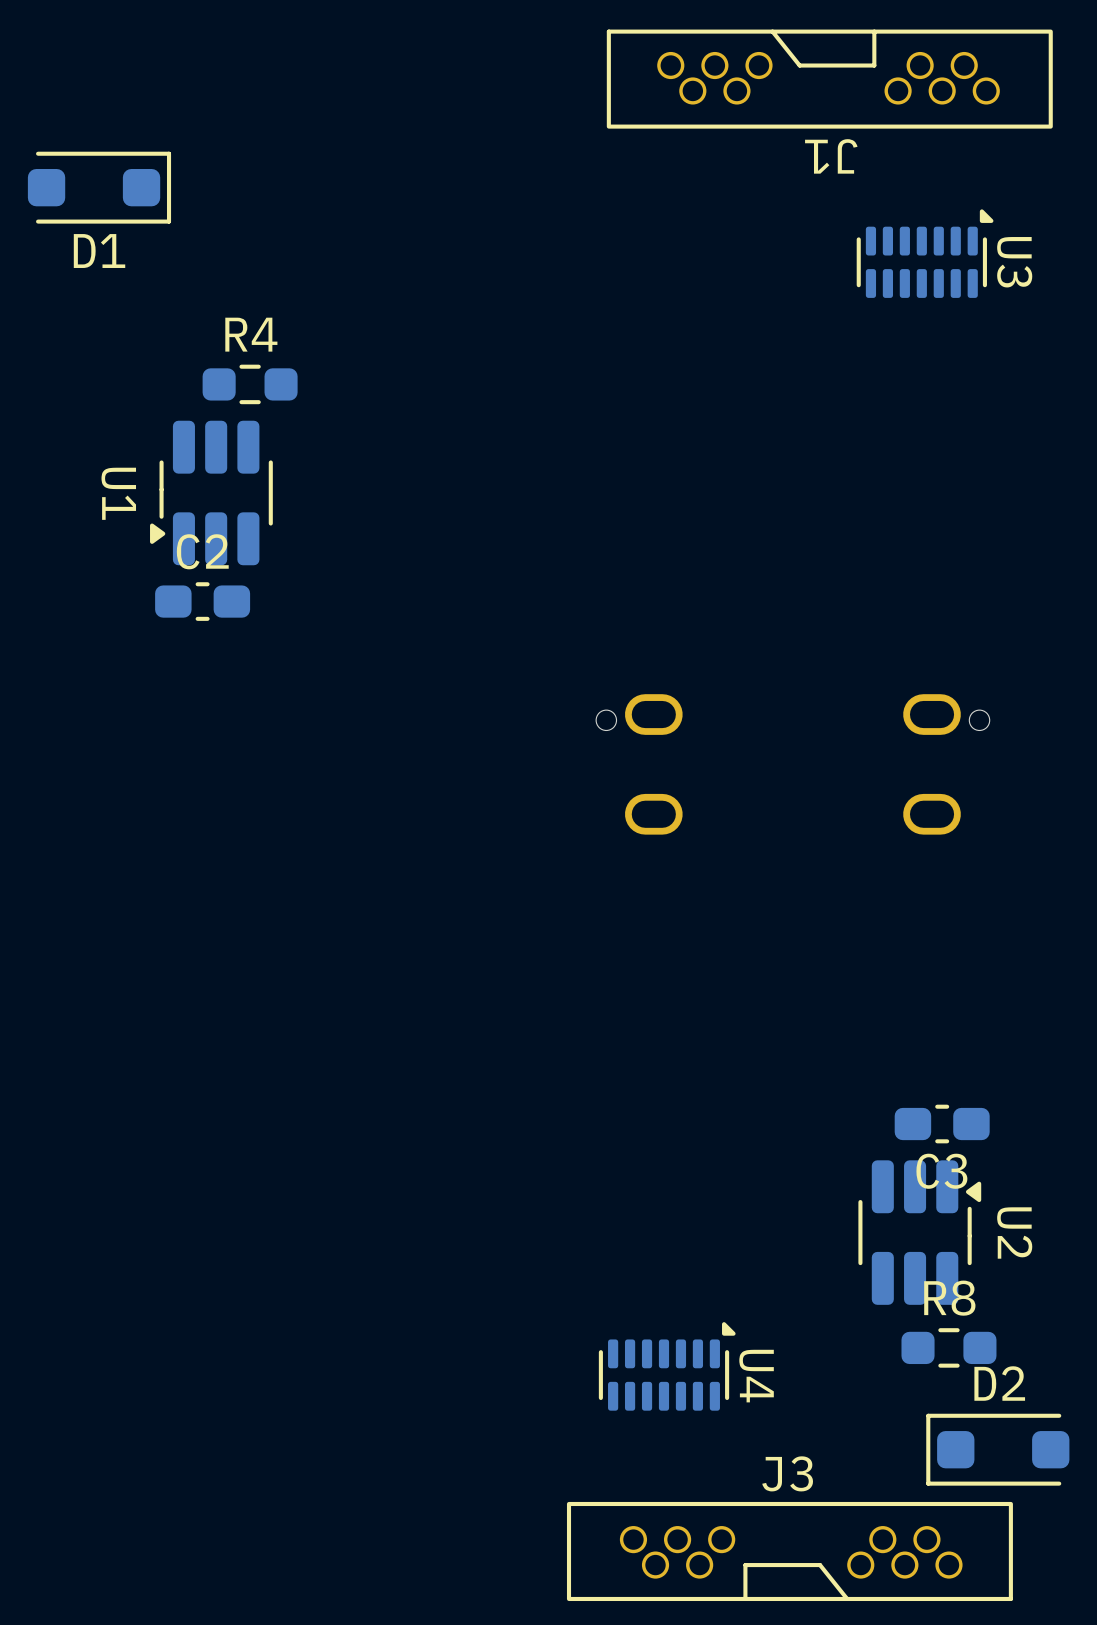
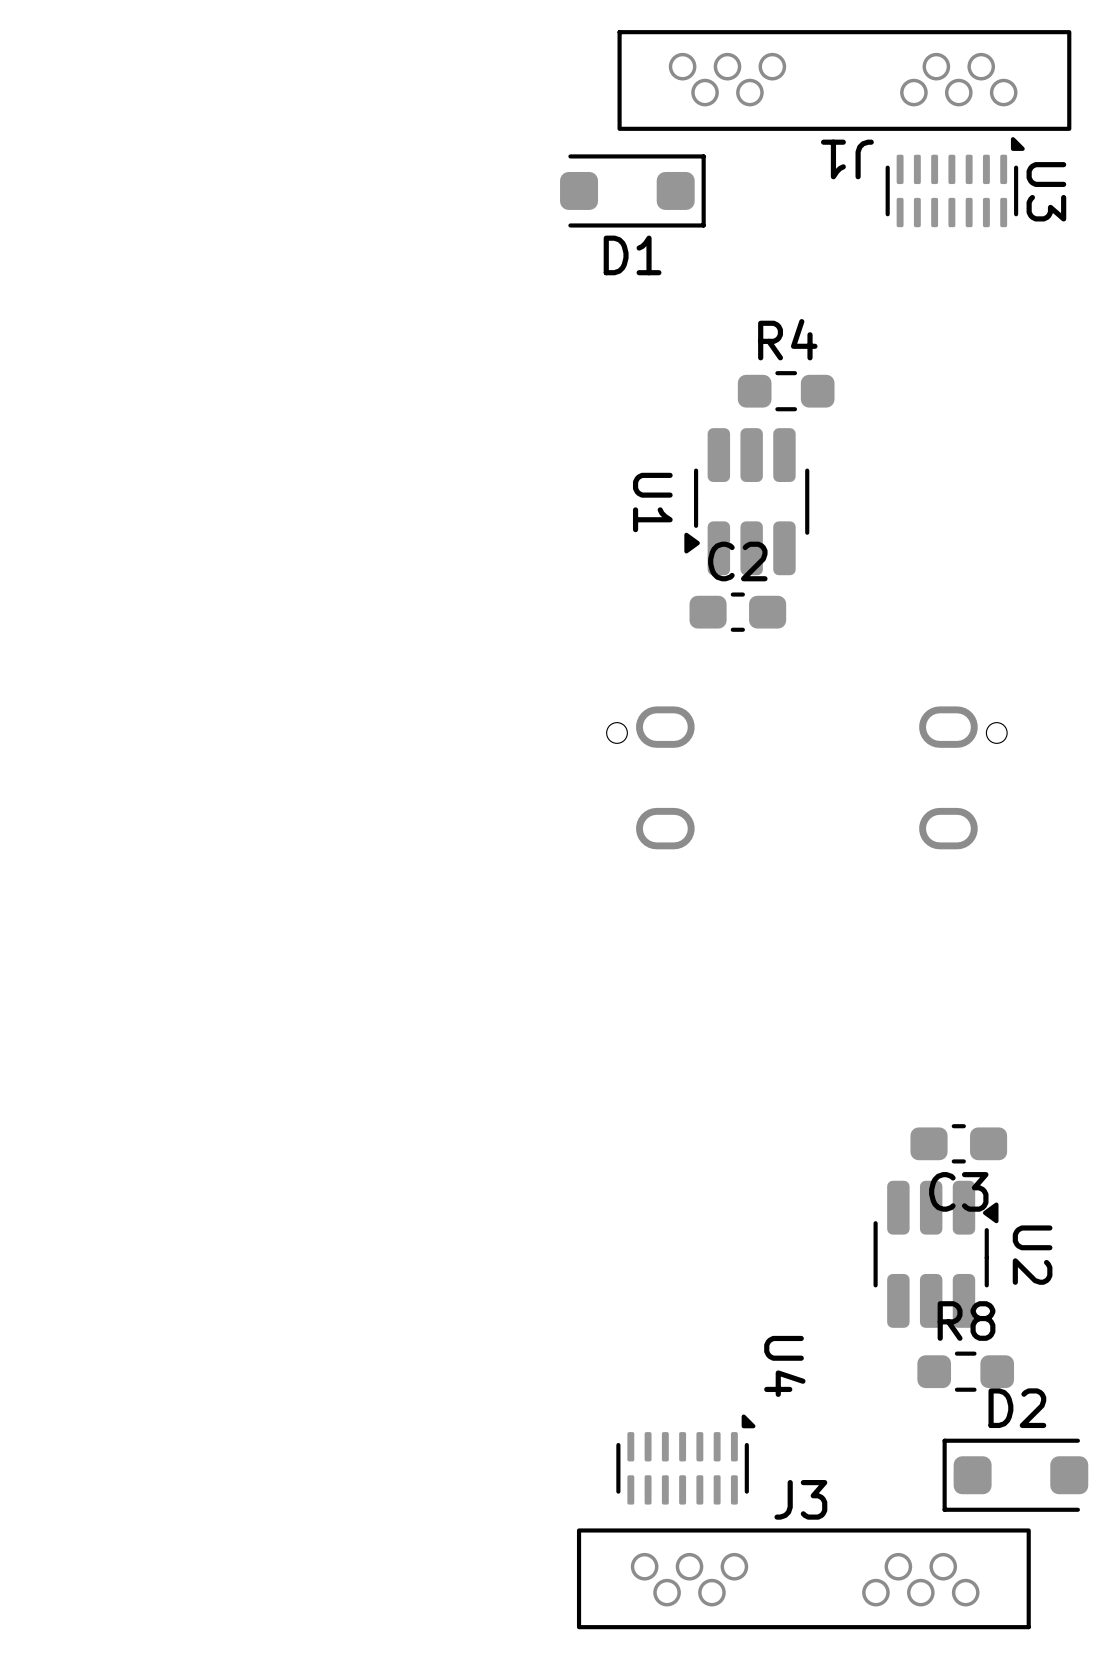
J1 footprint: [606, 29, 1053, 129] -> [617, 30, 1072, 131]
D1 position: (99, 187) -> (632, 190)
U3 footprint: [856, 209, 994, 298] -> [885, 137, 1025, 228]
R4 position: (250, 384) -> (786, 391)
U1 position: (211, 492) -> (746, 501)
C2 position: (202, 601) -> (737, 612)
U4 footprint: [598, 1322, 736, 1411] -> [616, 1414, 756, 1505]
U4 name position: U4 (756, 1376) -> U4 (784, 1366)
J3 footprint: [566, 1501, 1013, 1602] -> [576, 1528, 1031, 1630]

